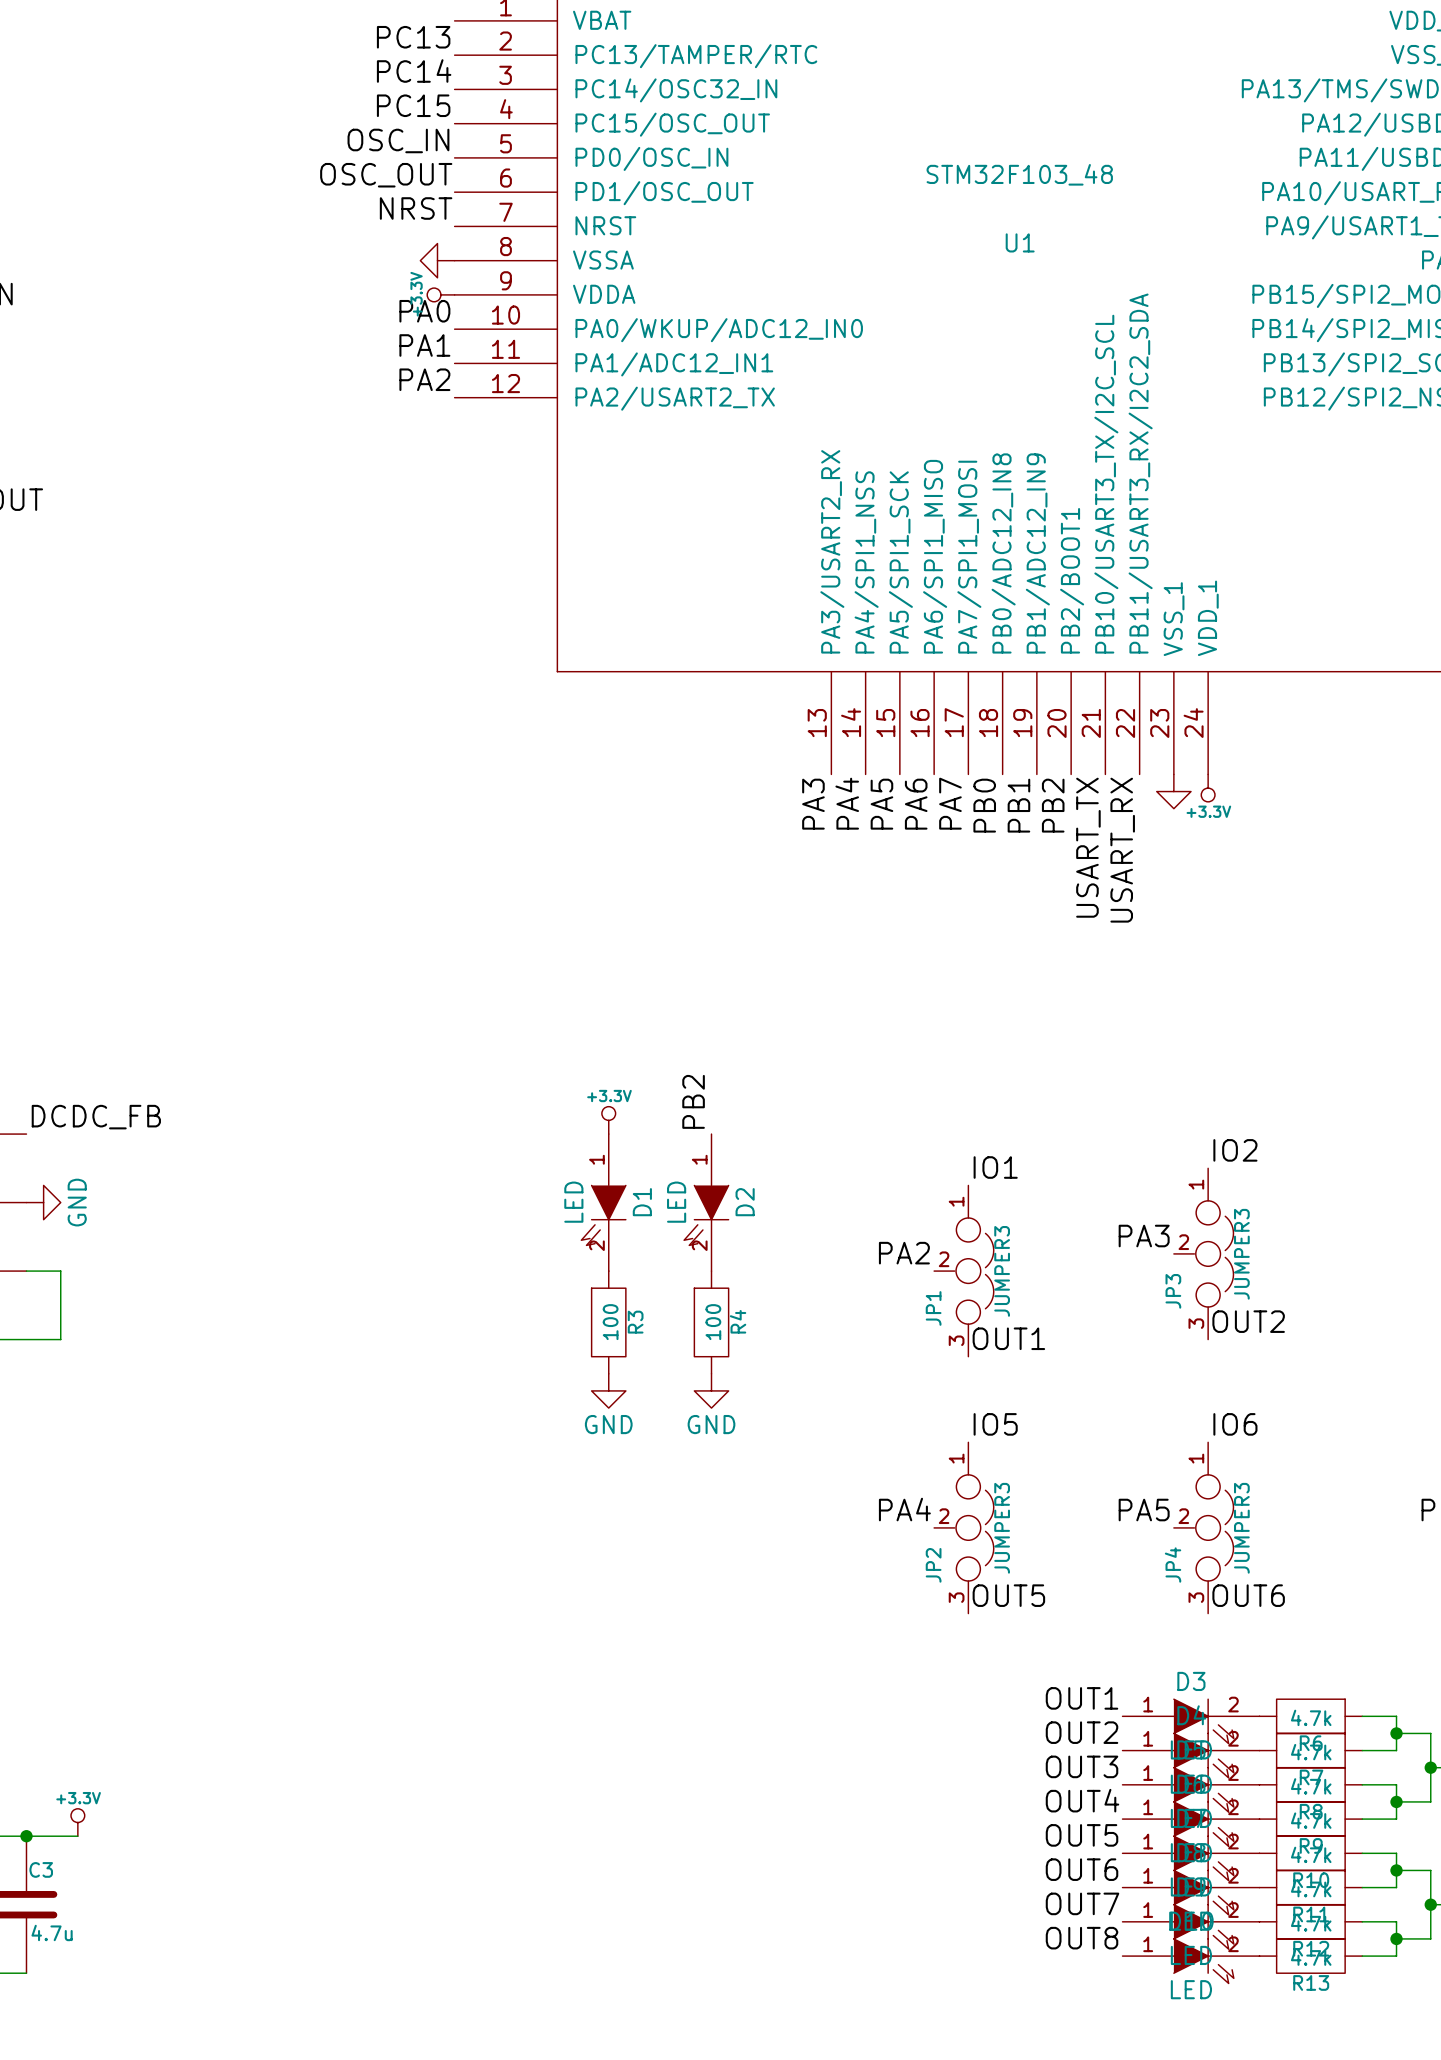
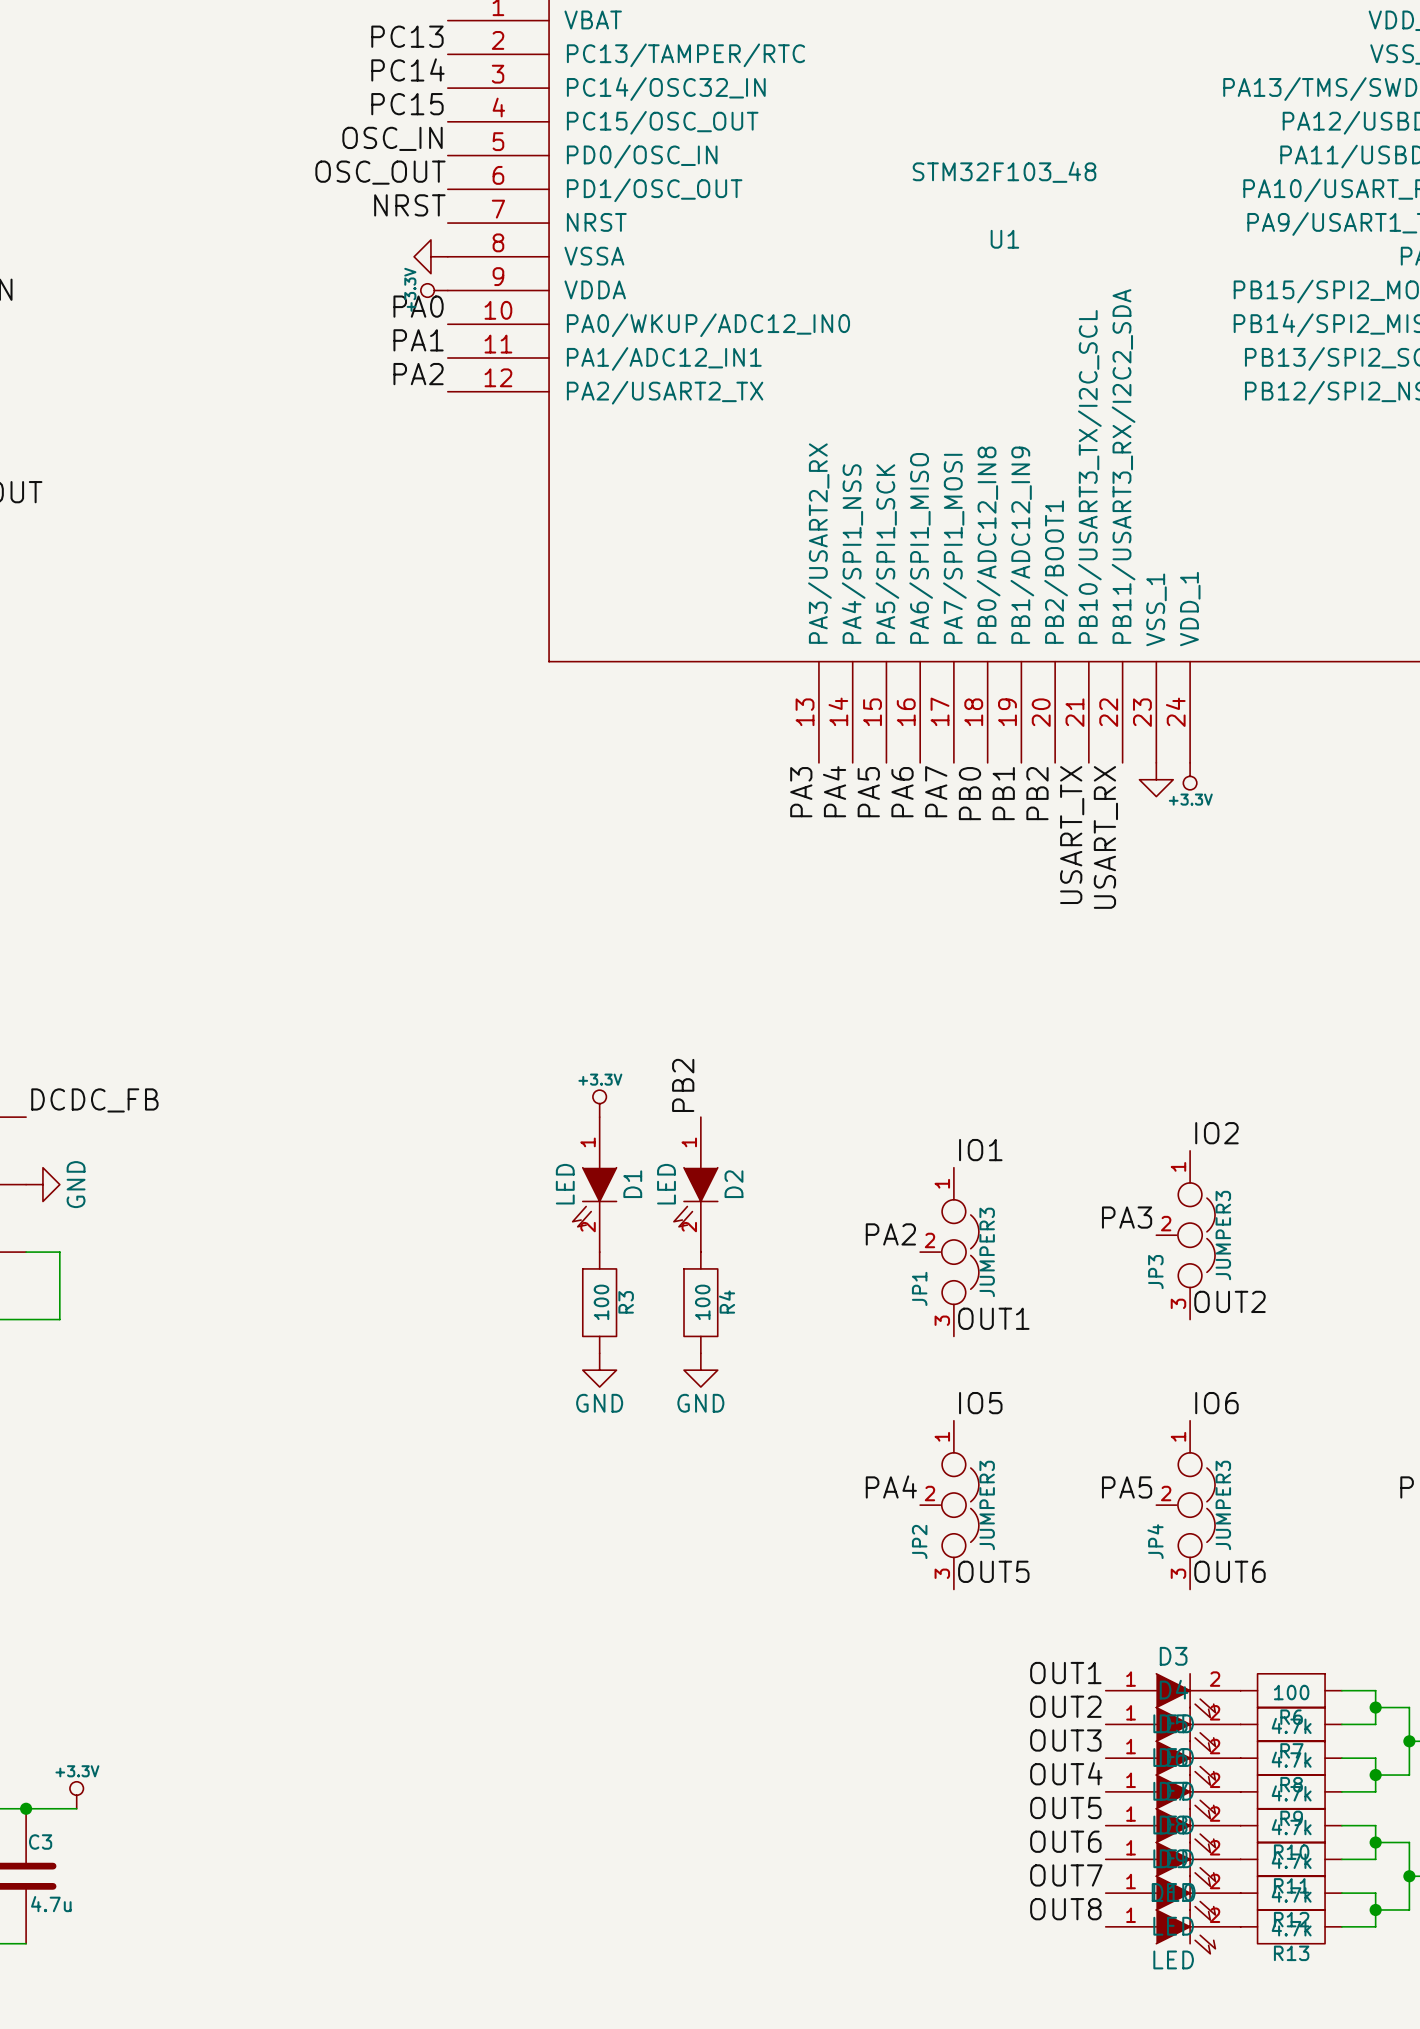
R6 value: 4.7k (1311, 1717) -> 100 (1291, 1692)

